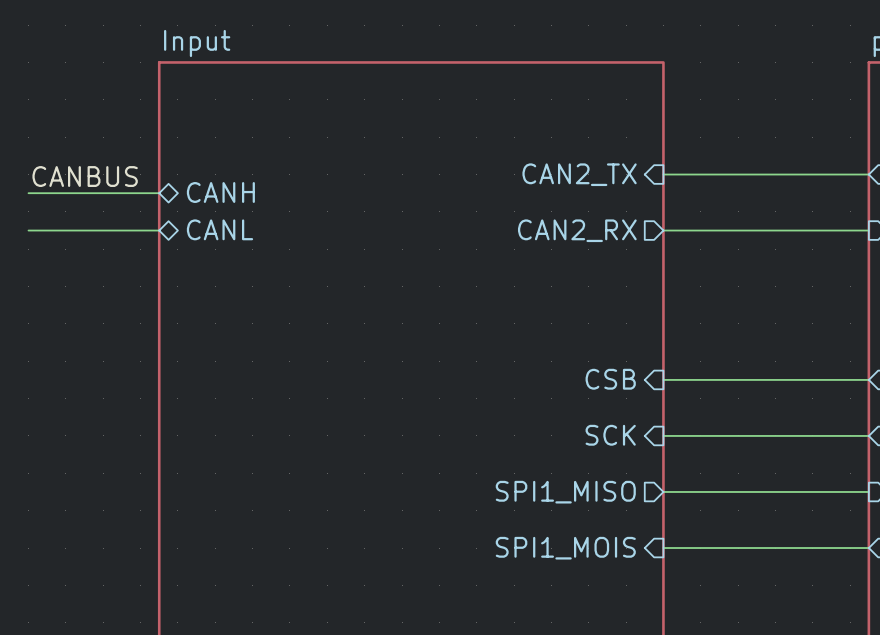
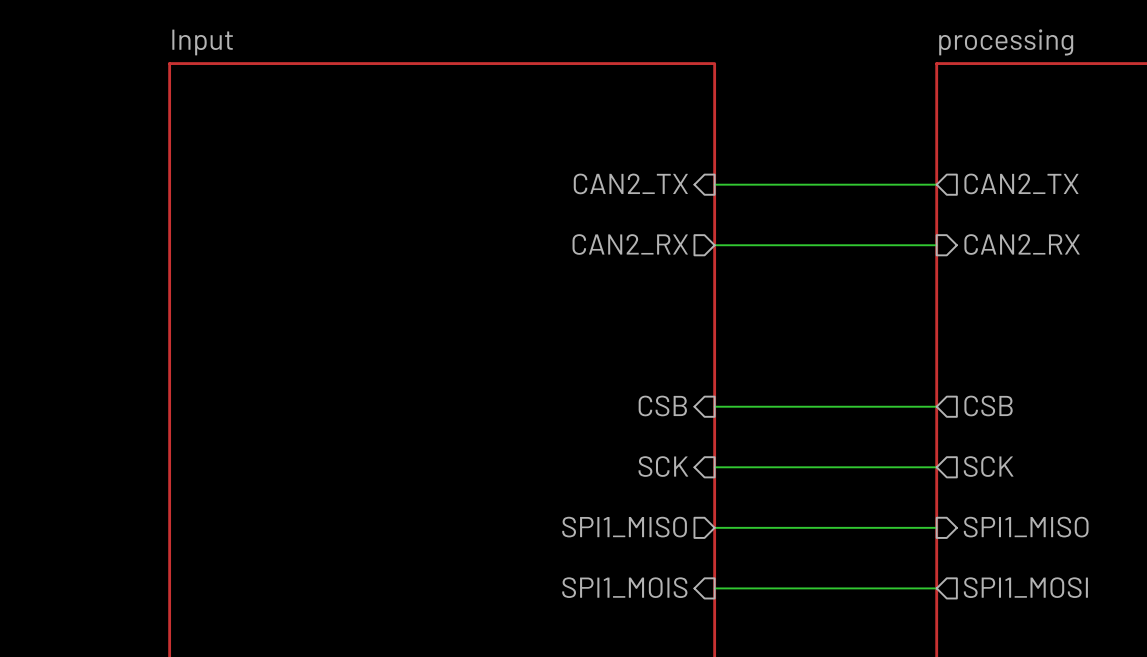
label: CANBUS (85, 176) -> none
sheet pin: CANH (220, 192) -> none
wire: (28, 193) (159, 193) -> none
sheet pin: CANL (220, 229) -> none
wire: (28, 230) (159, 230) -> none

